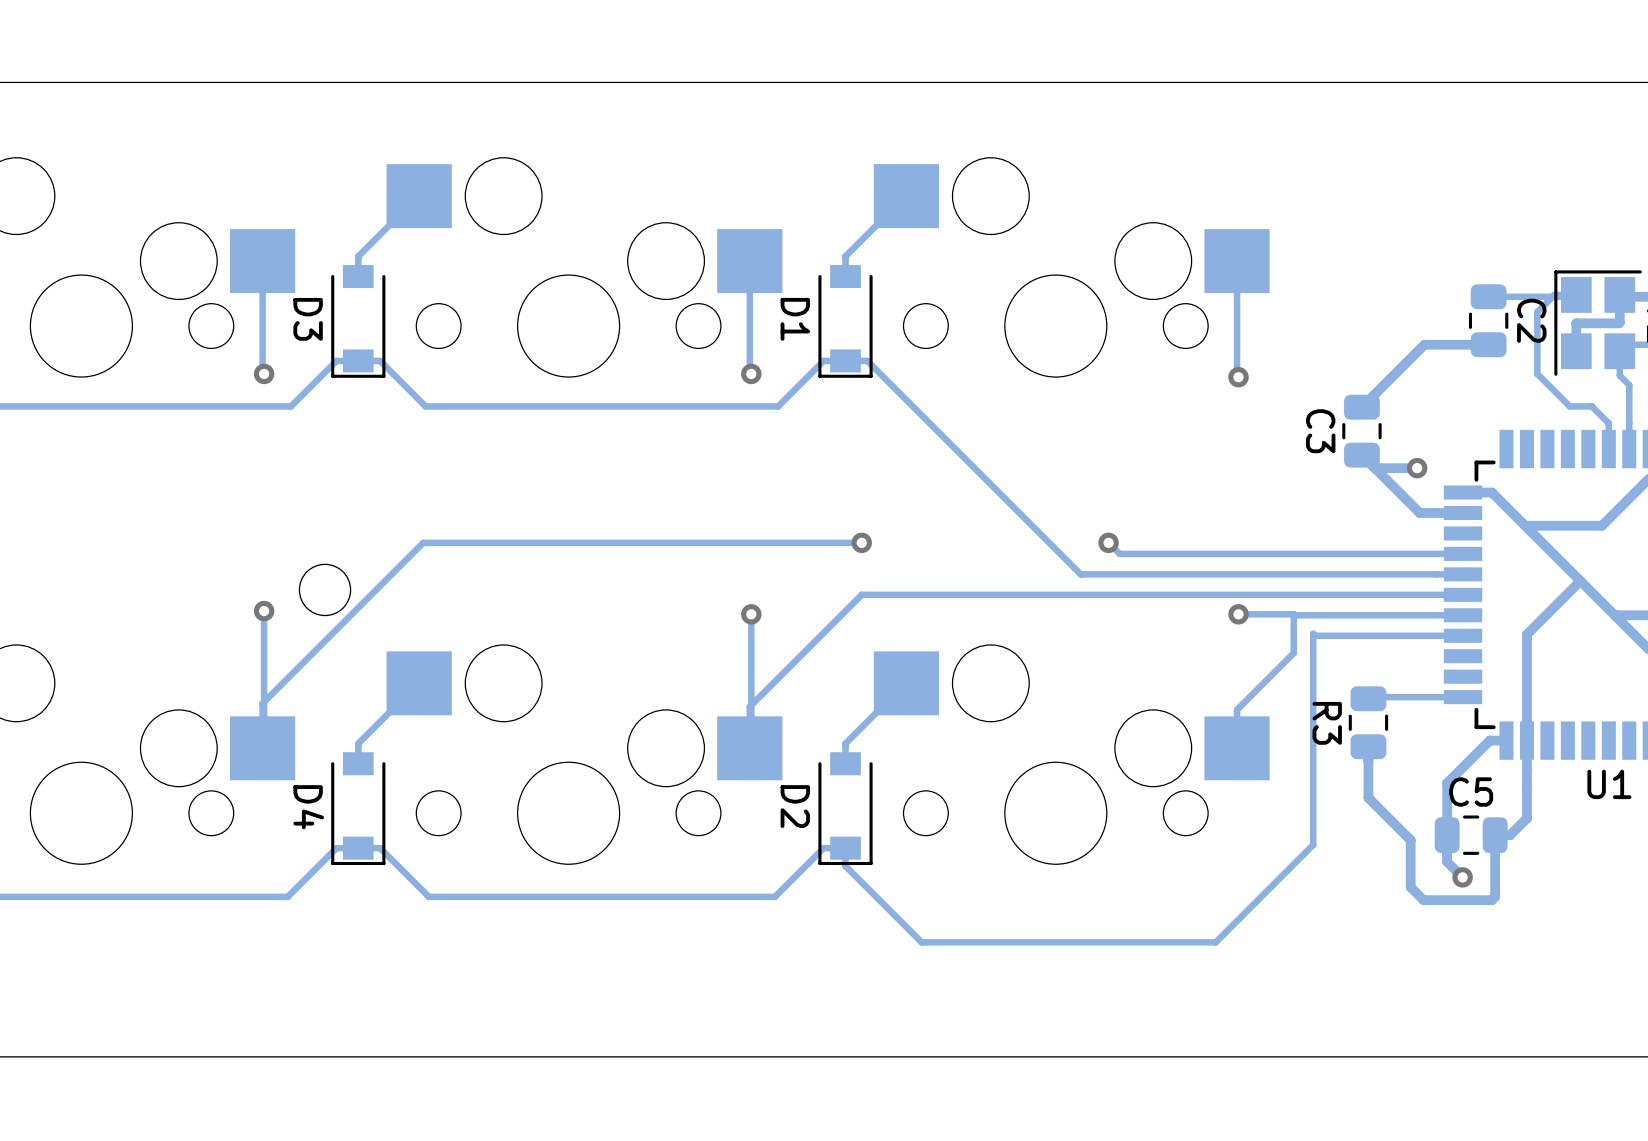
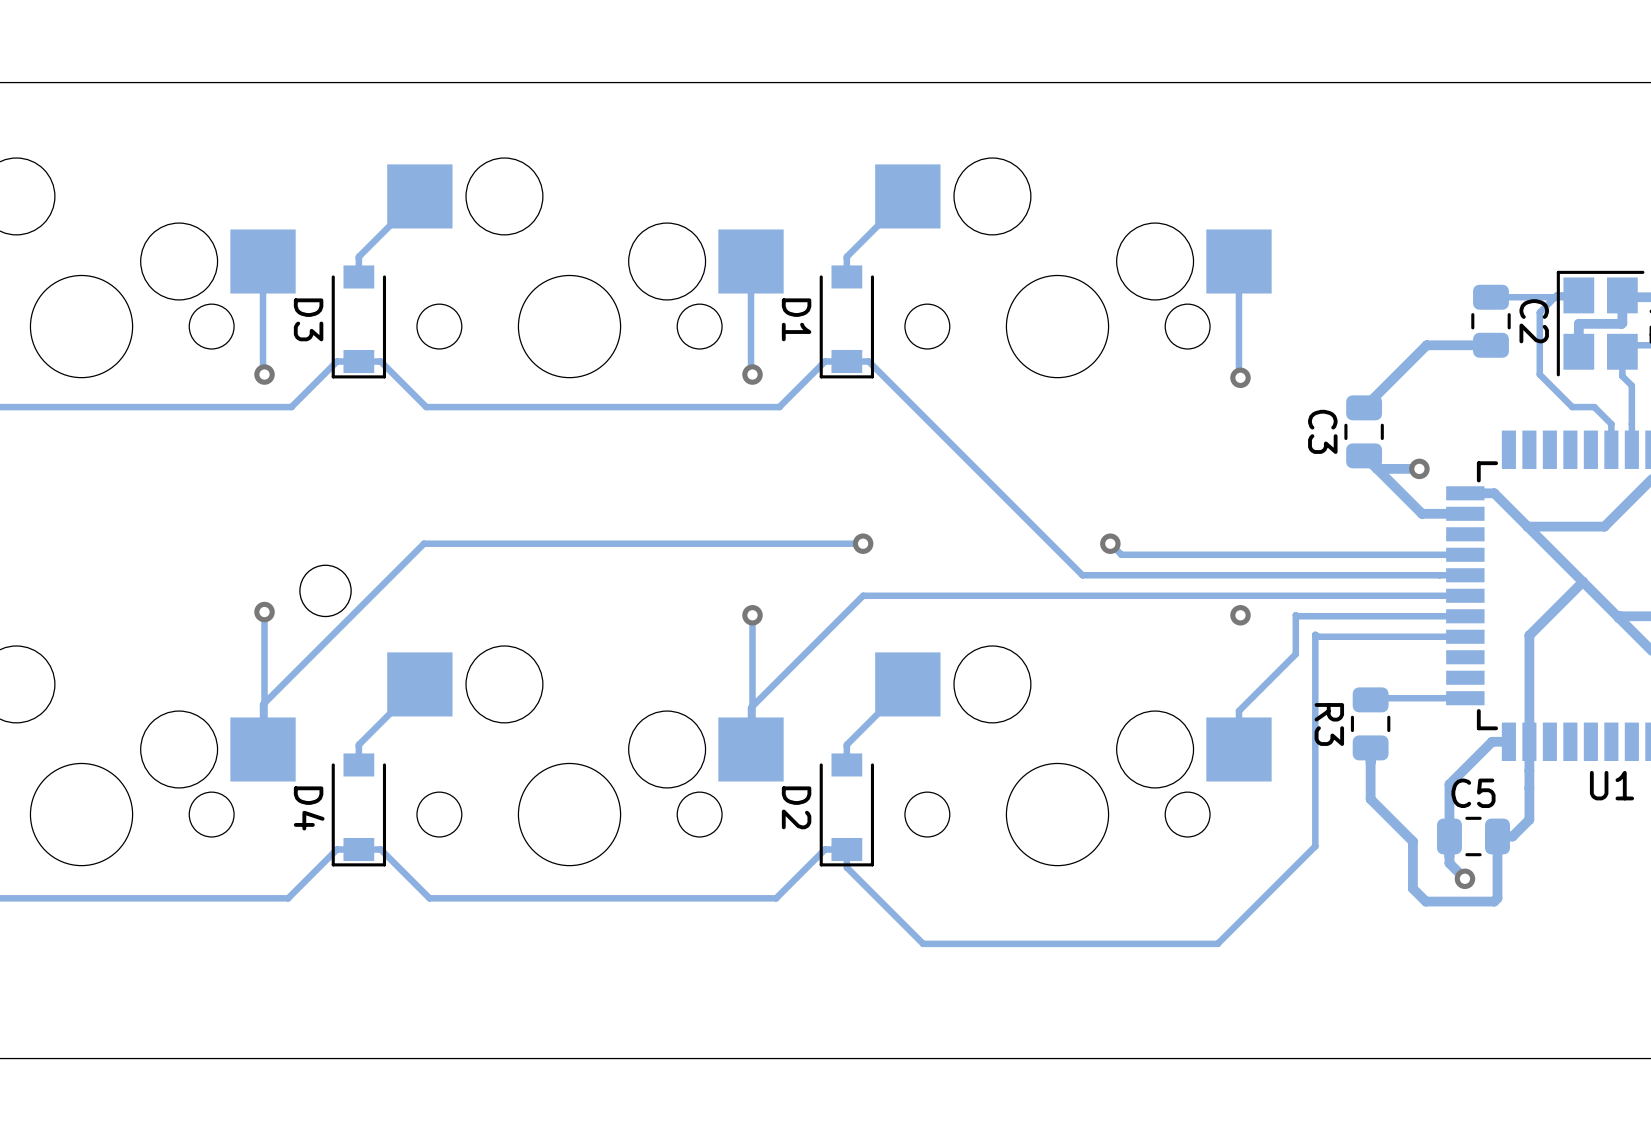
track: (1293, 614) (1238, 614) -> none

